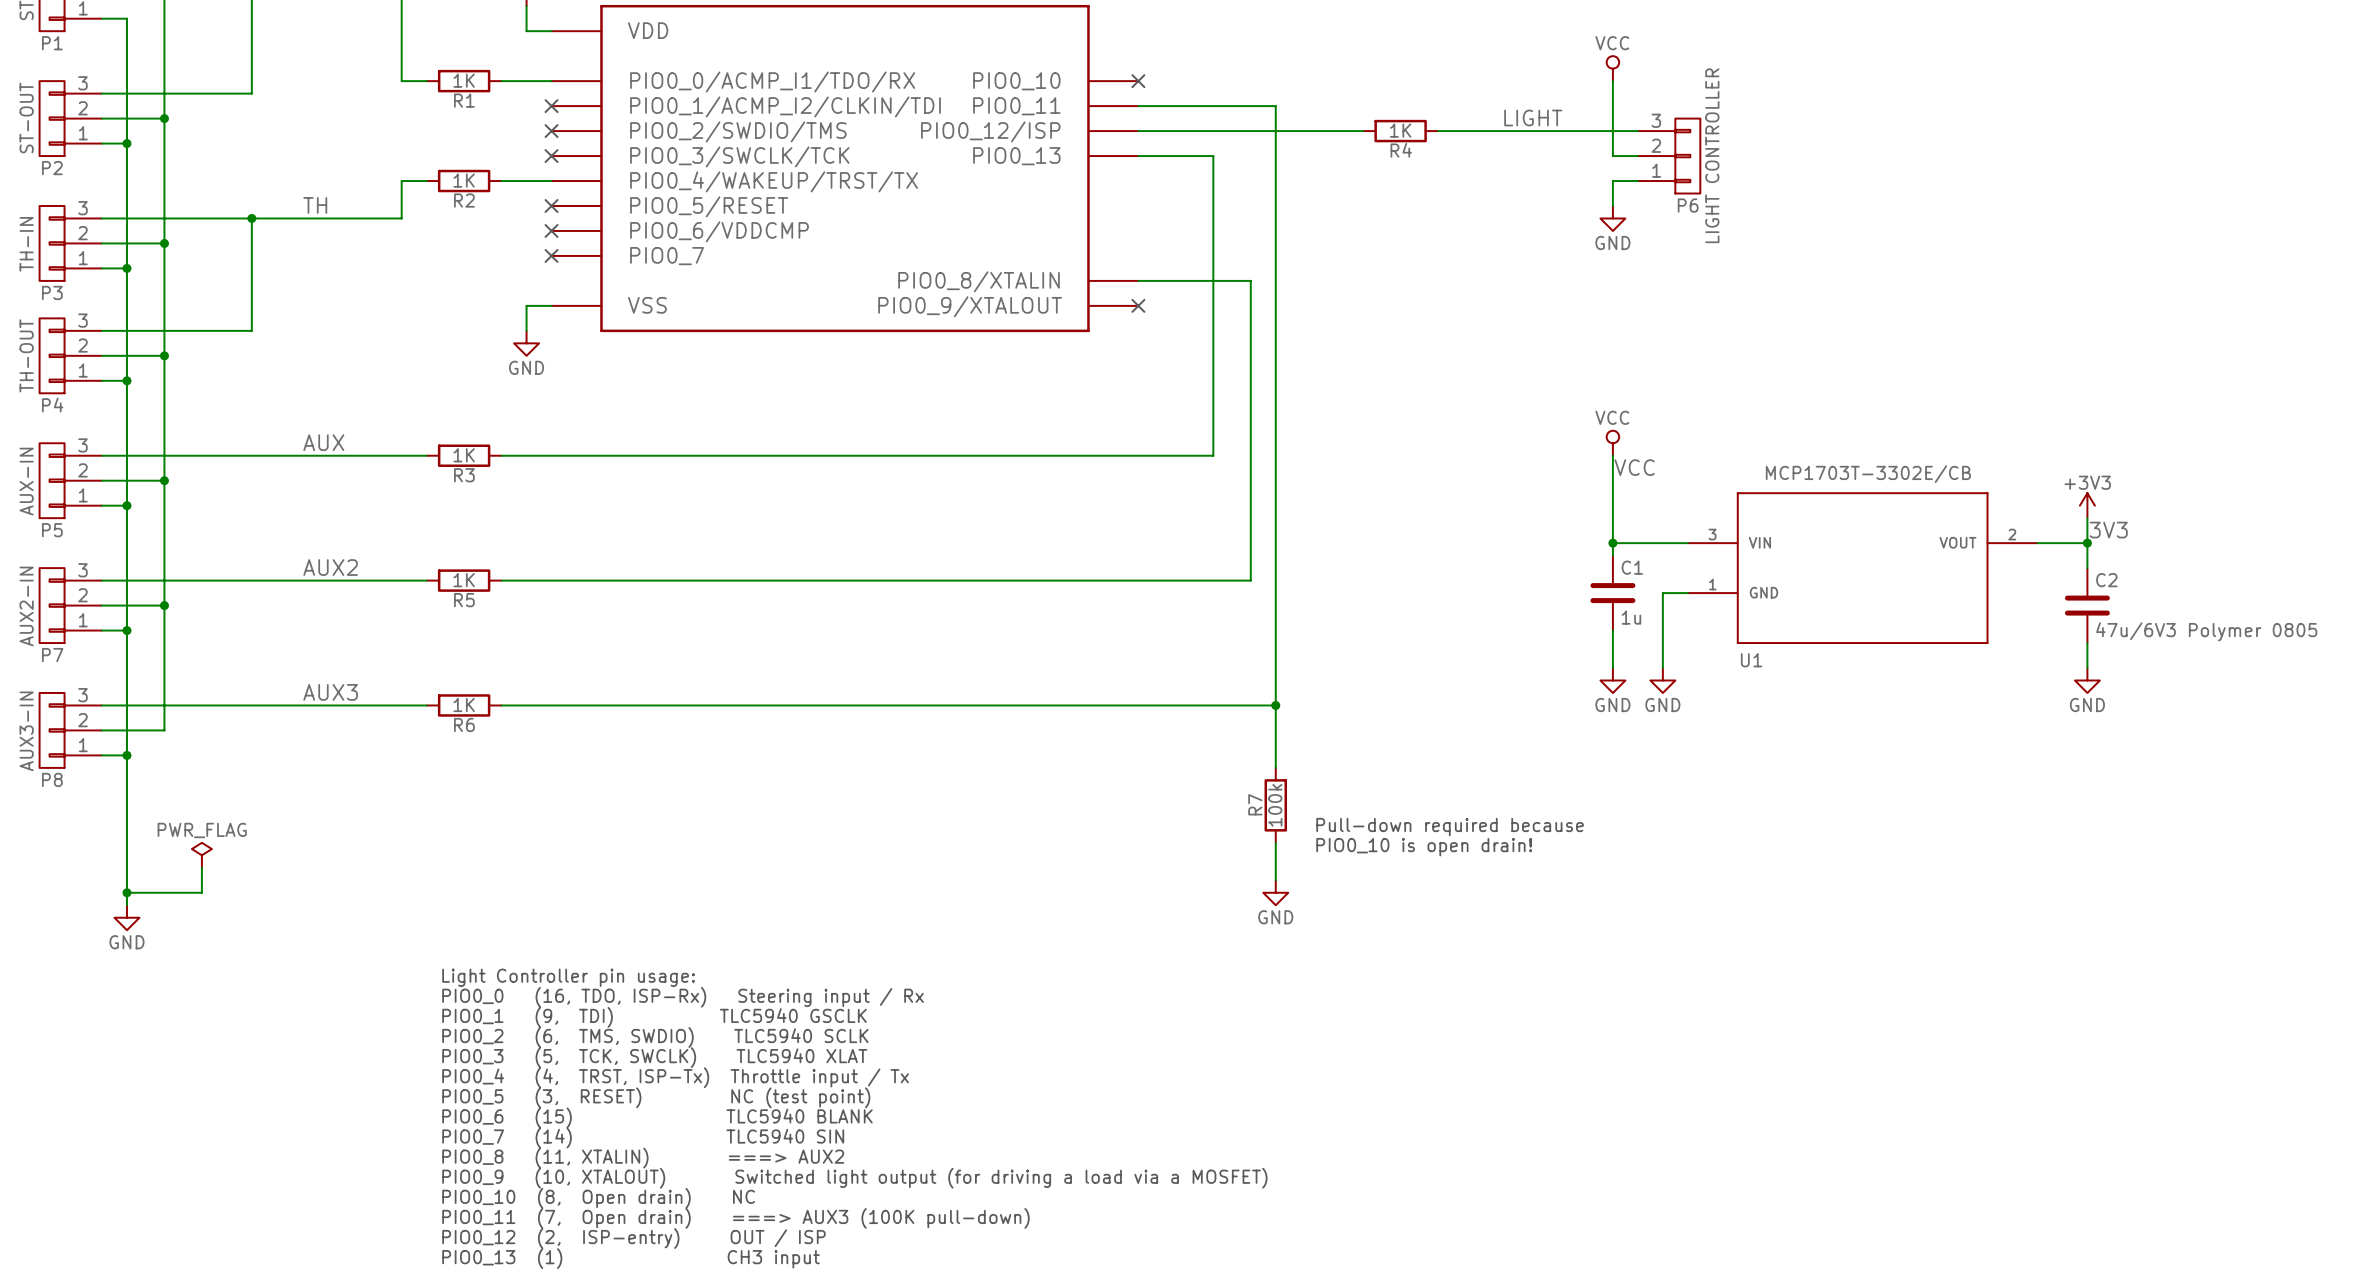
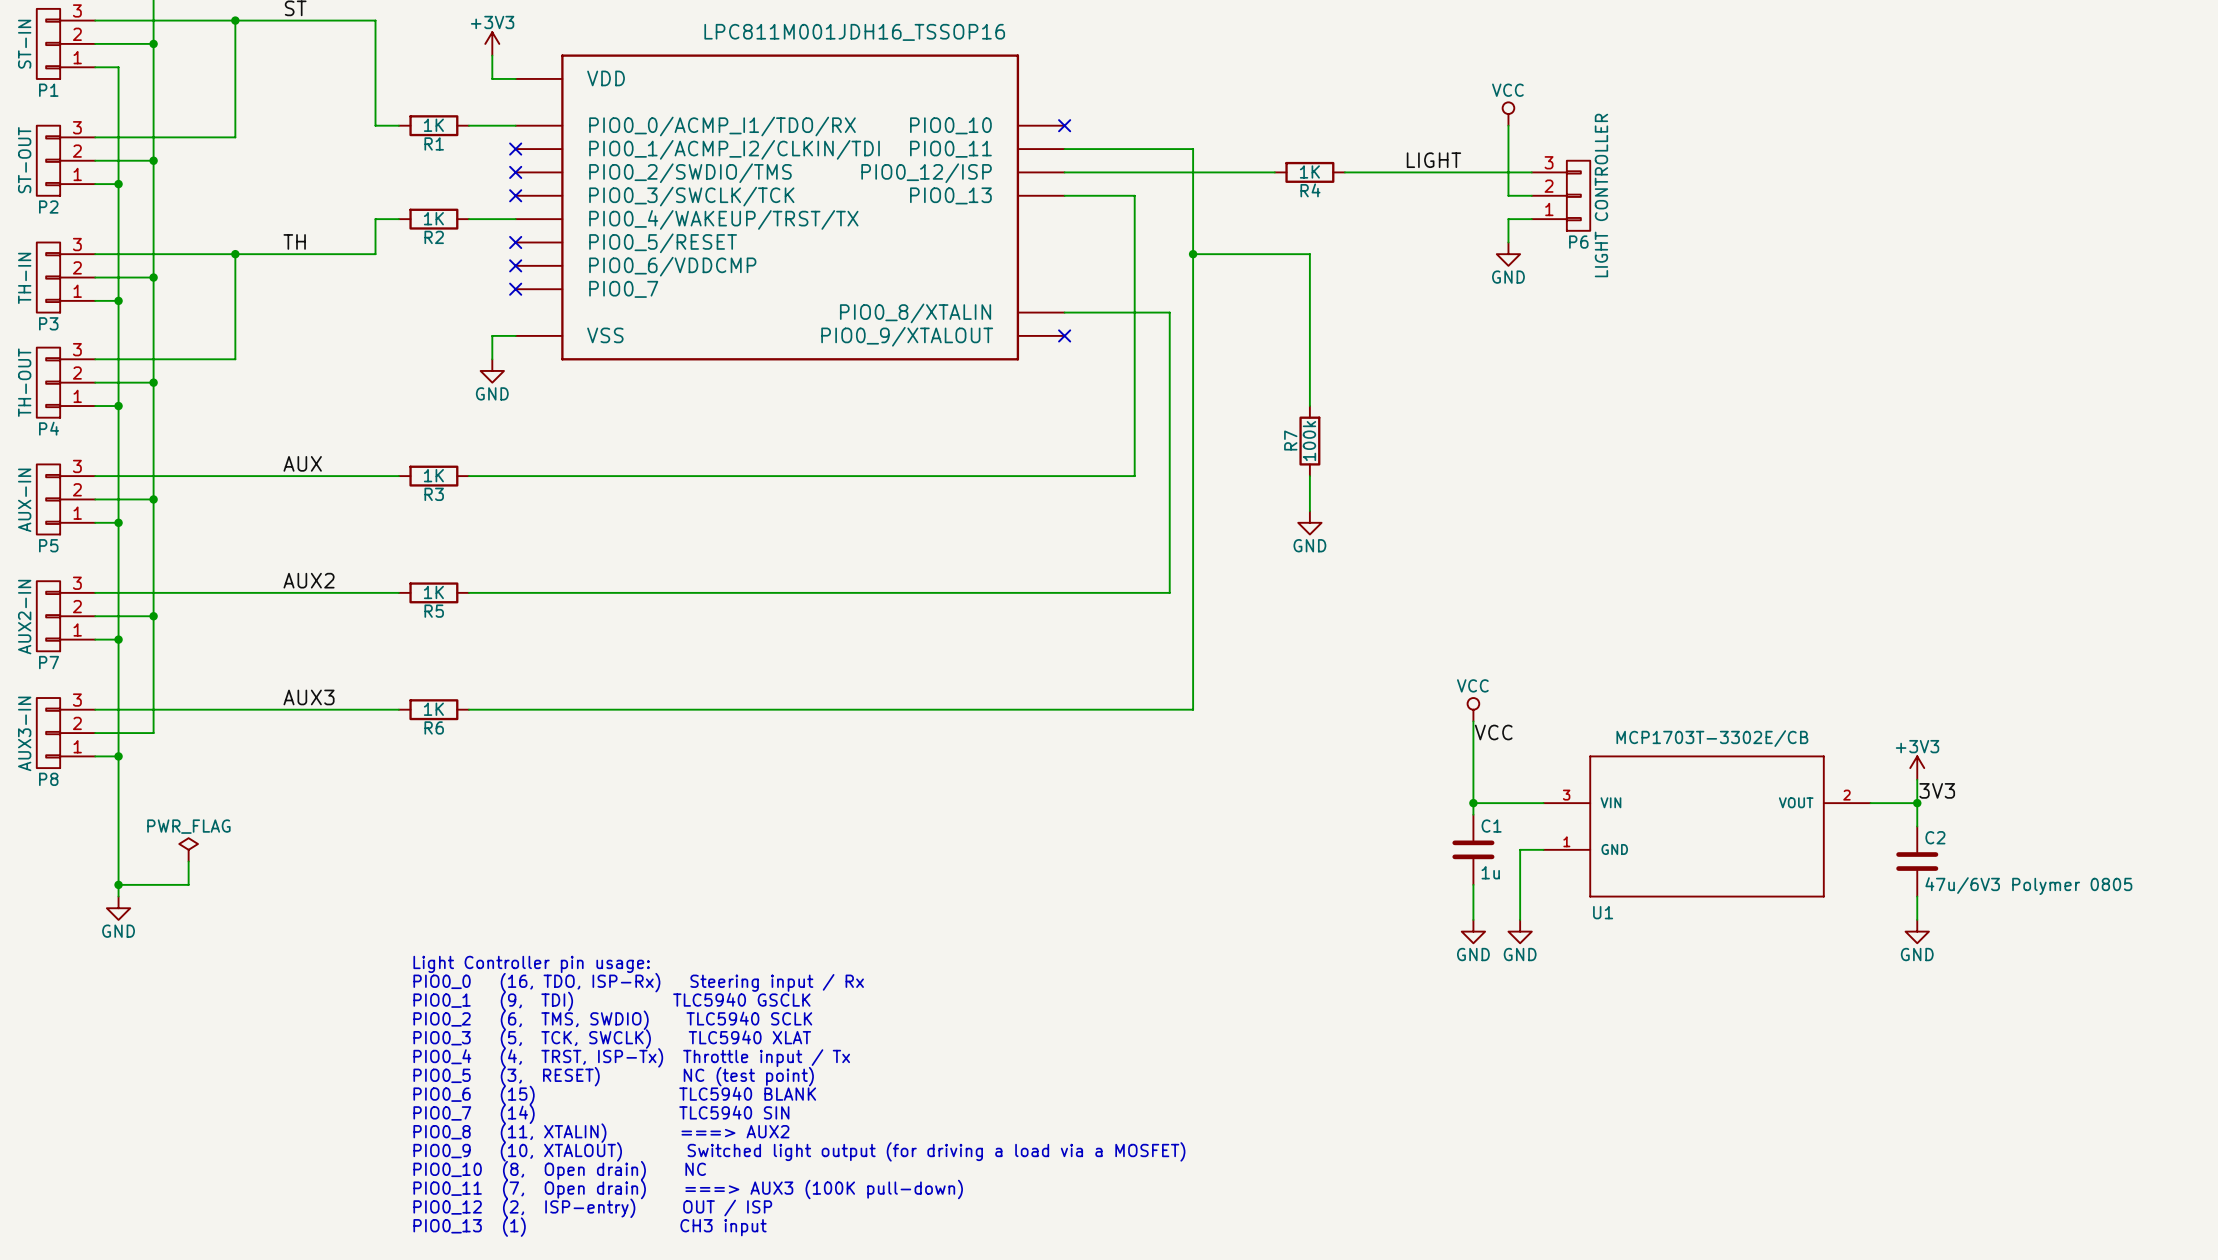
wire: none -> (1193, 254) (1309, 254) (1309, 406)
junction: none -> (1193, 254)
power symbol: VCC (1612, 443) -> none
wire: none -> (1309, 476) (1309, 511)
wire: (1612, 455) (1612, 555) -> none
label: VCC (1634, 467) -> none
power symbol: none -> GND (1309, 522)
power symbol: +3V3 (2087, 505) -> none
wire: (2087, 518) (2087, 568) -> none
label: 3V3 (2108, 530) -> none
wire: (1612, 543) (1687, 543) -> none
junction: (1612, 543) -> none
wire: (2037, 543) (2087, 543) -> none
junction: (2087, 543) -> none
U1 position: (1862, 568) -> (1707, 826)
C1 position: (1612, 593) -> (1473, 849)
wire: (1687, 593) (1662, 593) (1662, 668) -> none
C2 position: (2087, 605) -> (1917, 861)
wire: (1612, 630) (1612, 668) -> none
wire: (2087, 643) (2087, 668) -> none
power symbol: GND (1612, 680) -> none
power symbol: GND (1662, 680) -> none
power symbol: GND (2087, 680) -> none
wire: (1275, 705) (1275, 767) -> none
junction: (1275, 705) -> none
power symbol: none -> VCC (1473, 709)
wire: none -> (1473, 721) (1473, 814)
label: none -> VCC (1493, 732)
power symbol: none -> +3V3 (1917, 768)
wire: none -> (1917, 779) (1917, 826)
label: none -> 3V3 (1937, 790)
R7 position: (1275, 805) -> (1309, 441)
wire: none -> (1473, 803) (1543, 803)
junction: none -> (1473, 803)
wire: none -> (1870, 803) (1917, 803)
junction: none -> (1917, 803)
text: Pull-down required because (1450, 827) -> none
wire: (1275, 842) (1275, 880) -> none
text: PIO0_10 is open drain! (1424, 847) -> none
wire: none -> (1543, 849) (1520, 849) (1520, 919)
power symbol: GND (1275, 892) -> none
wire: none -> (1473, 884) (1473, 919)
wire: none -> (1917, 896) (1917, 919)
power symbol: none -> GND (1473, 931)
power symbol: none -> GND (1520, 931)
power symbol: none -> GND (1917, 931)

